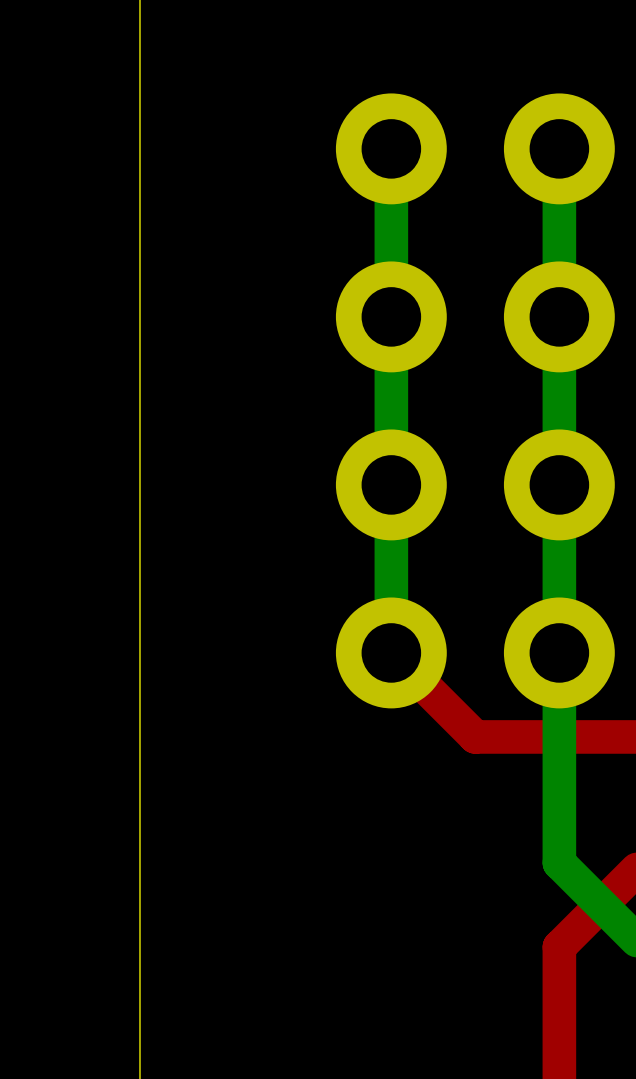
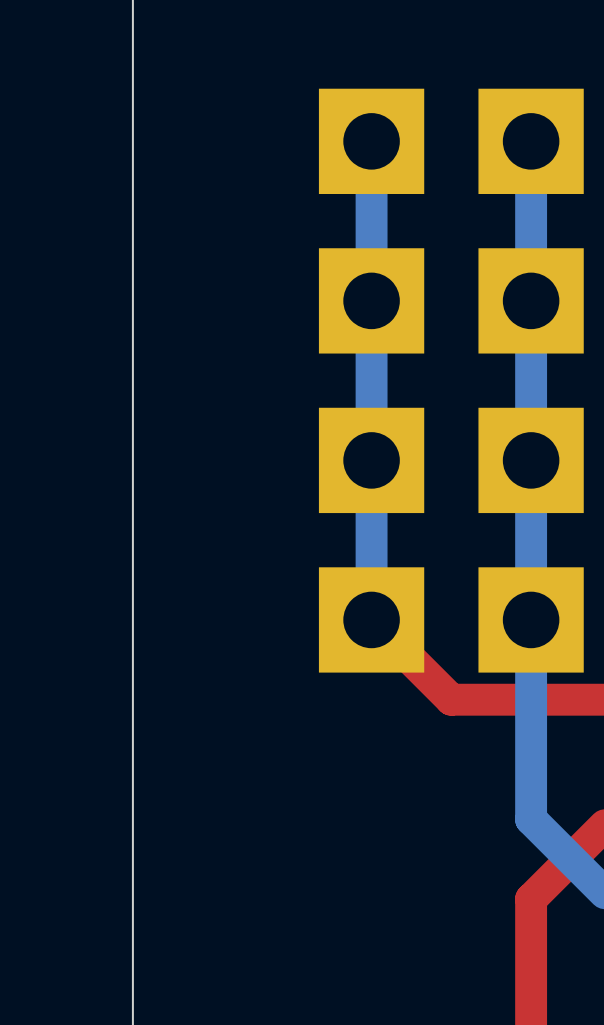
part footprint: [335, 93, 447, 709] -> [318, 88, 425, 673]
part footprint: [503, 93, 615, 709] -> [478, 88, 584, 673]

